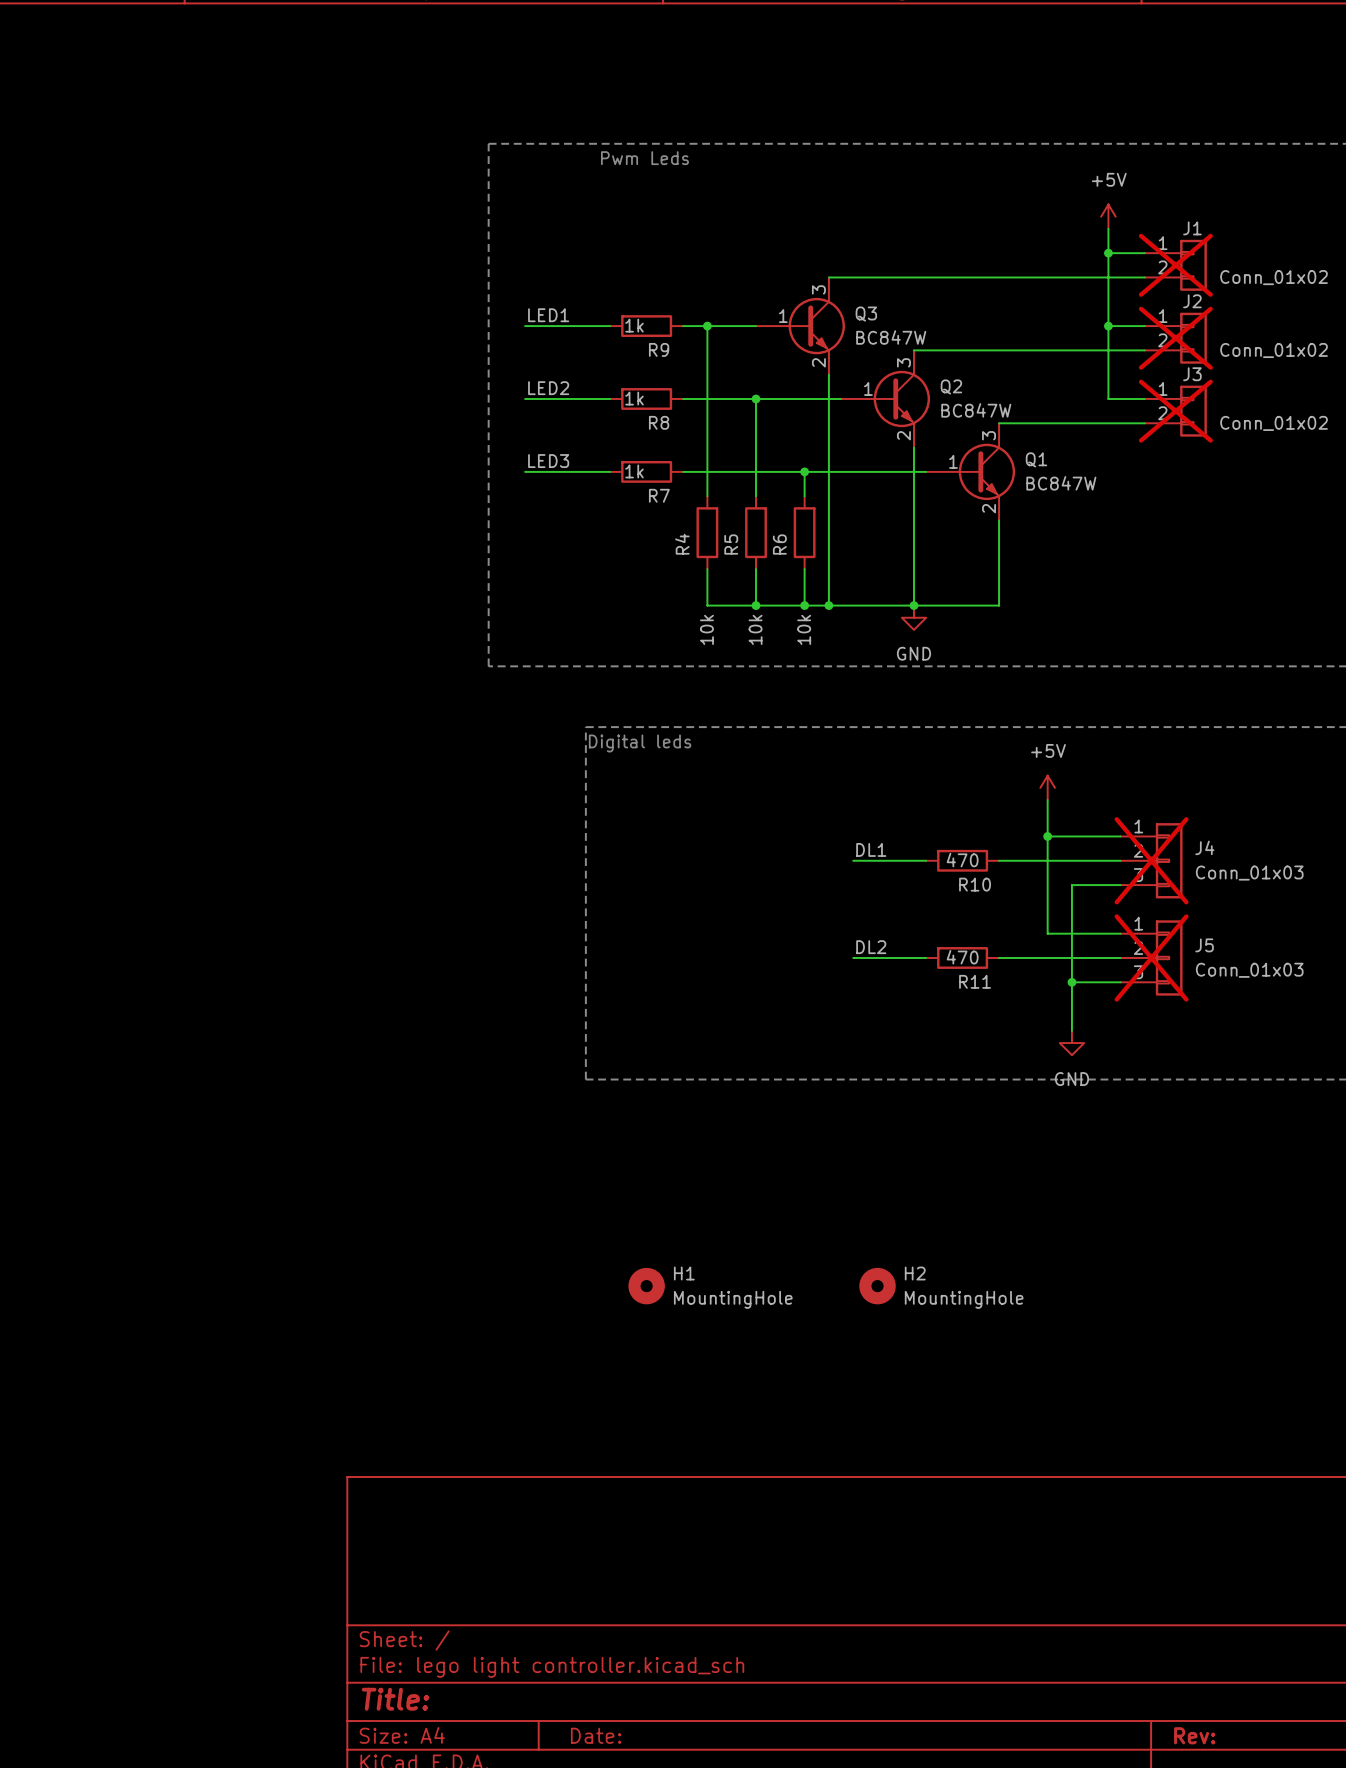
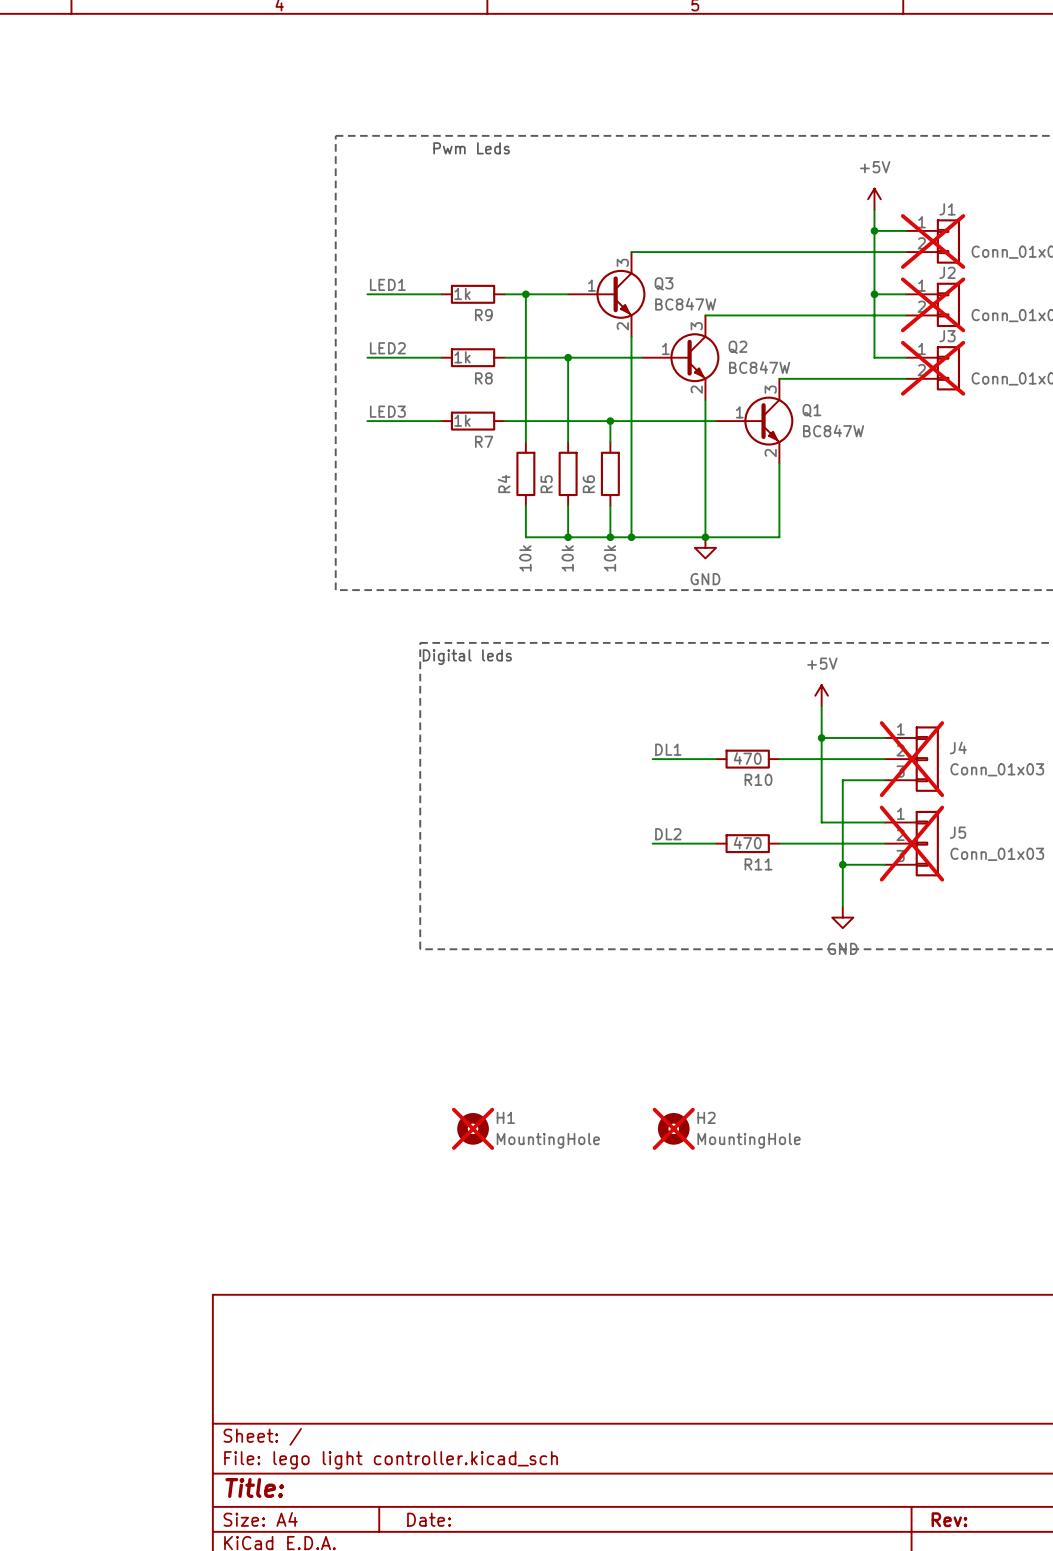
H1 do-not-place cross: none -> (473, 1128)
H2 do-not-place cross: none -> (673, 1128)

